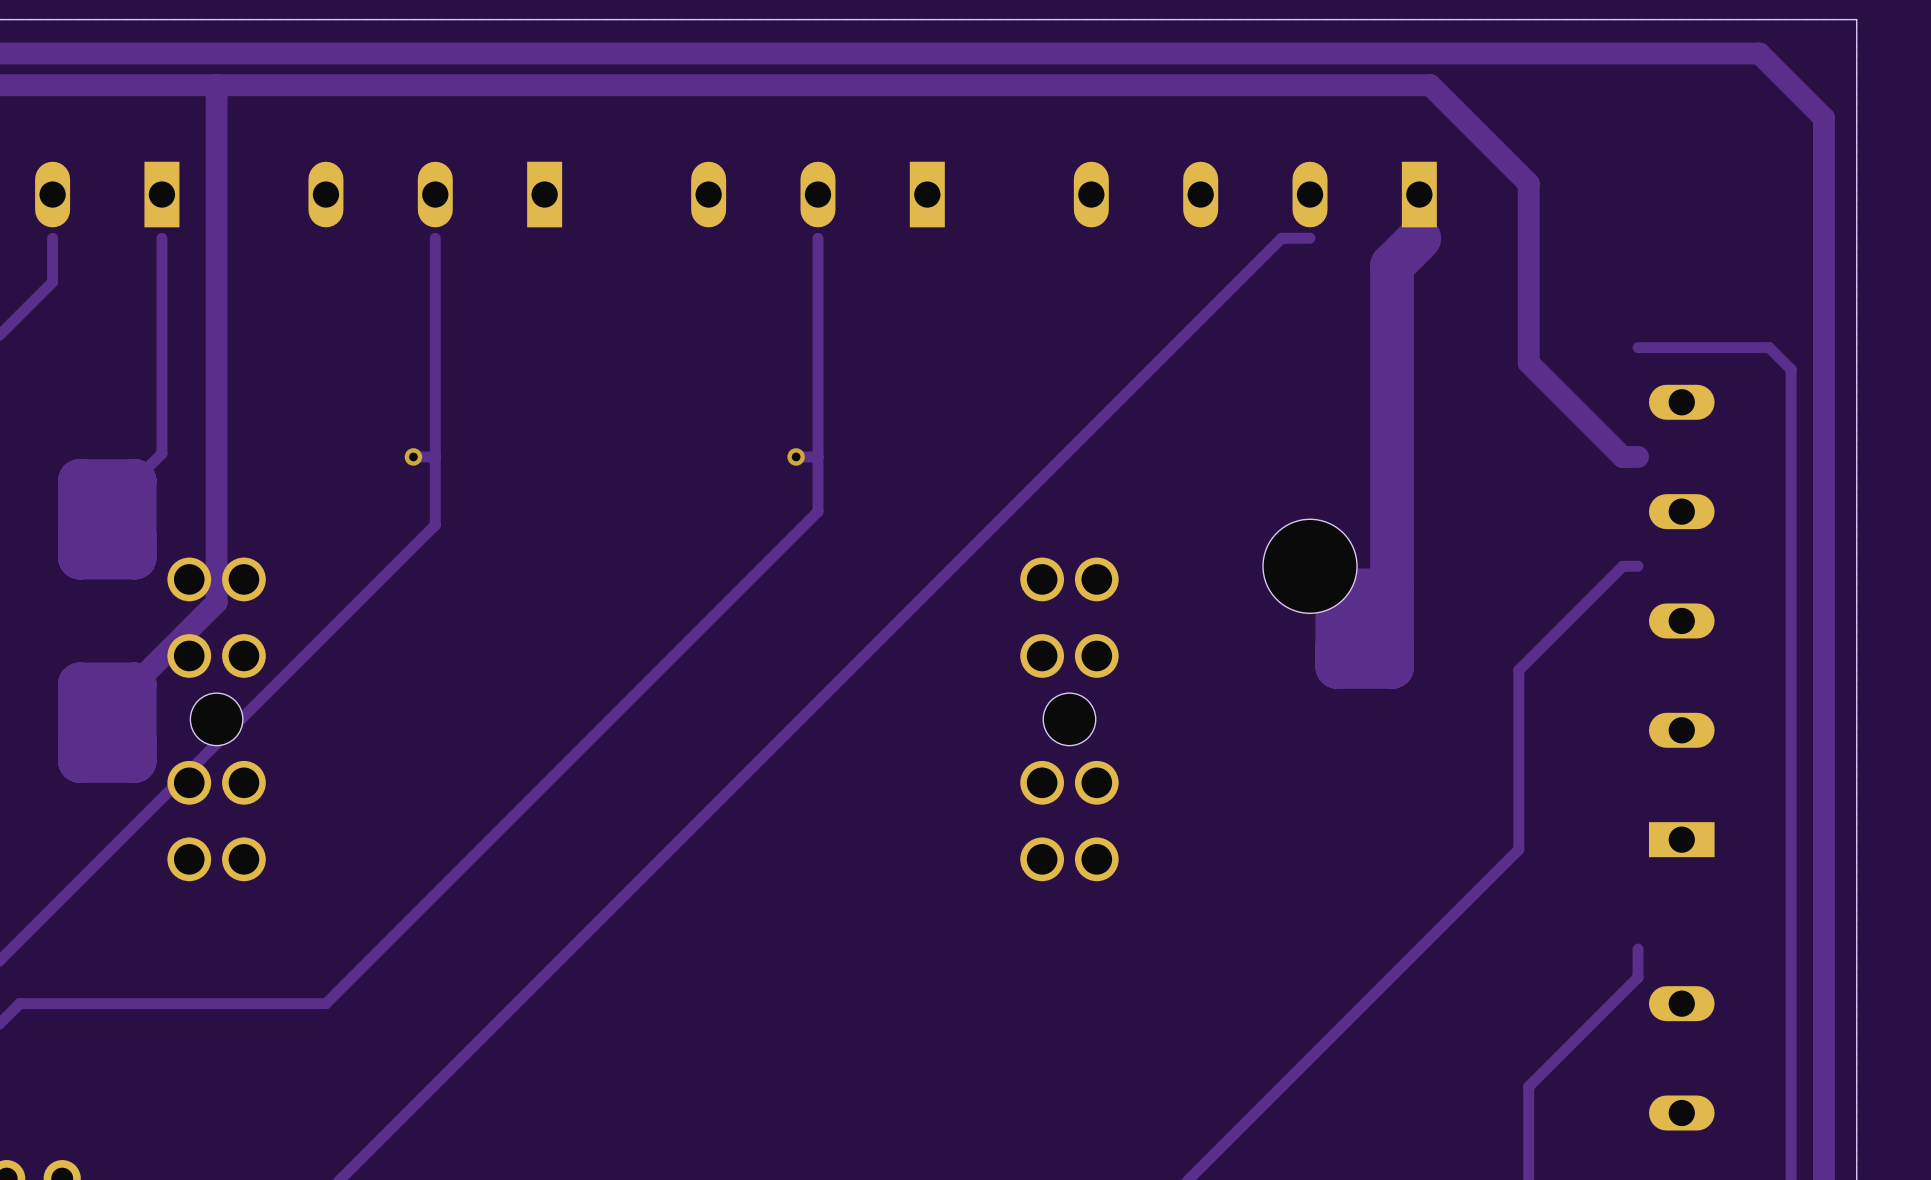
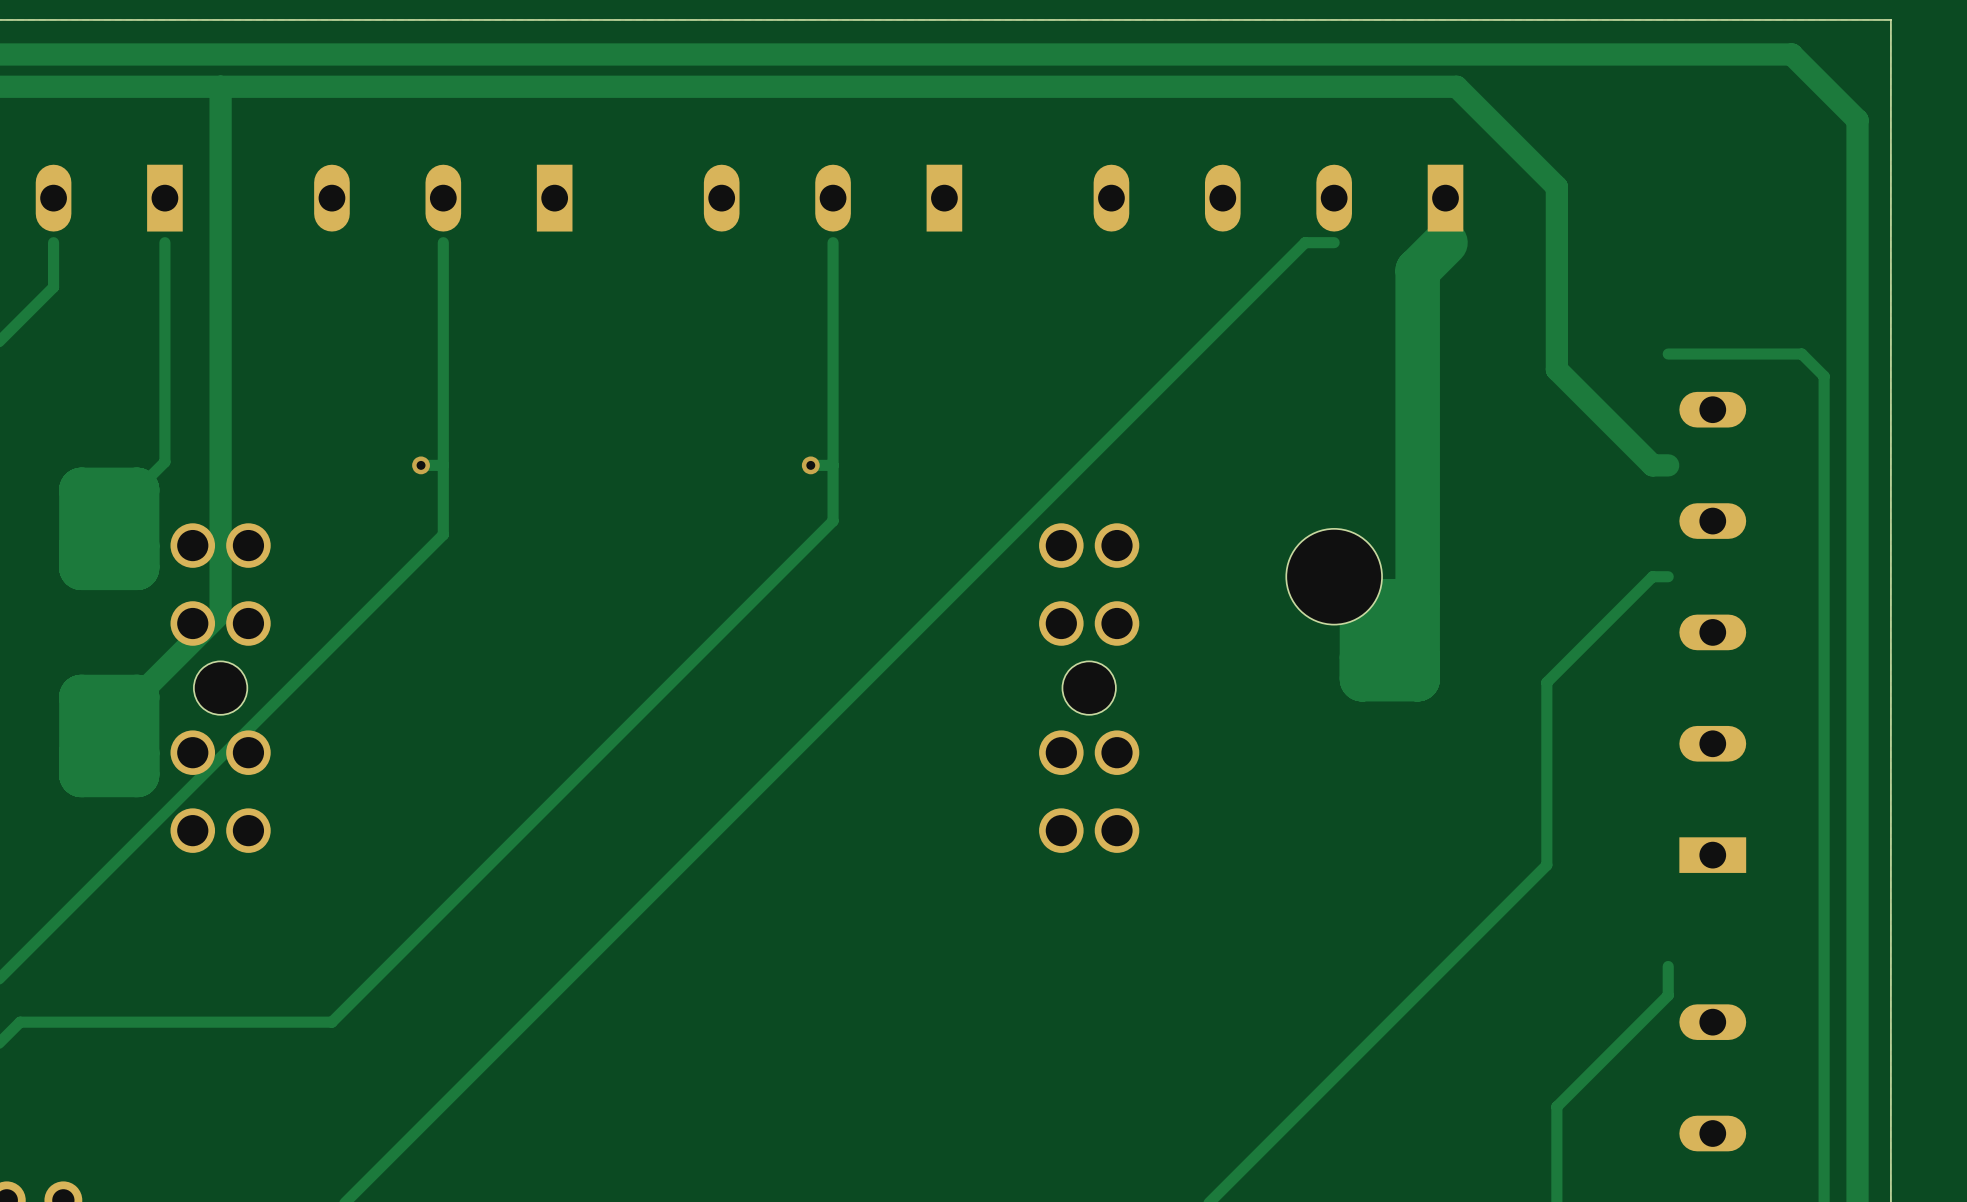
part position: (216, 719) -> (220, 688)
part position: (1069, 719) -> (1089, 688)

